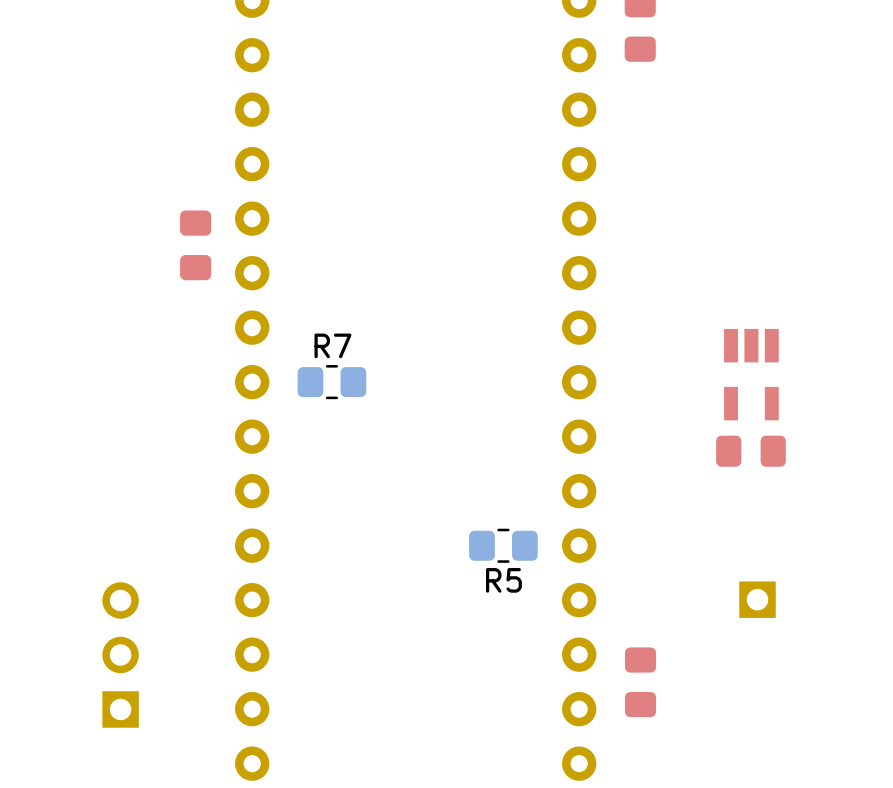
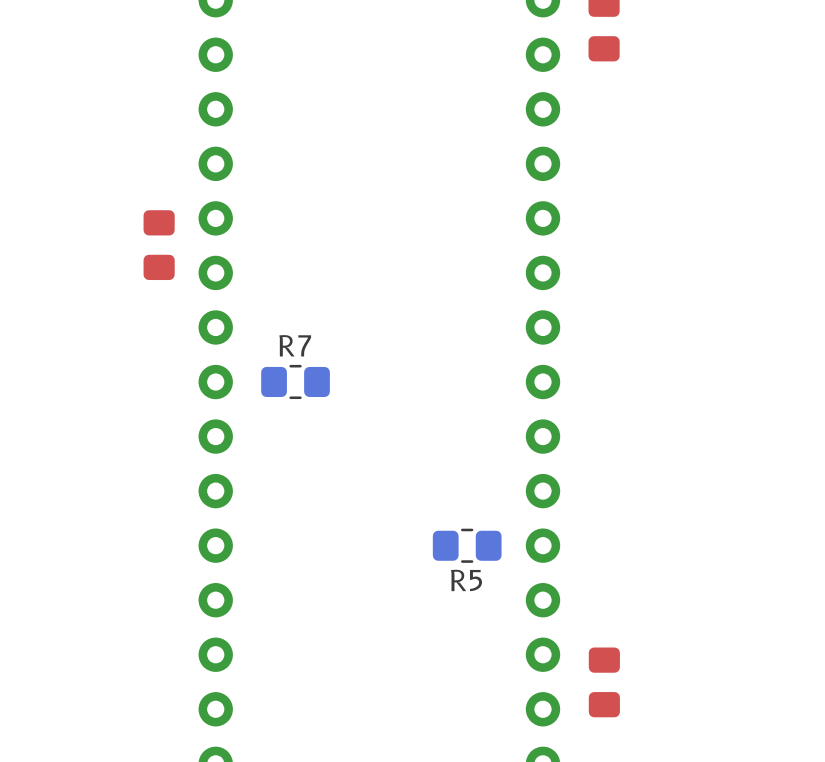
part: (751, 374) -> none
part: (750, 451) -> none
part: (757, 599) -> none
part: (120, 654) -> none

